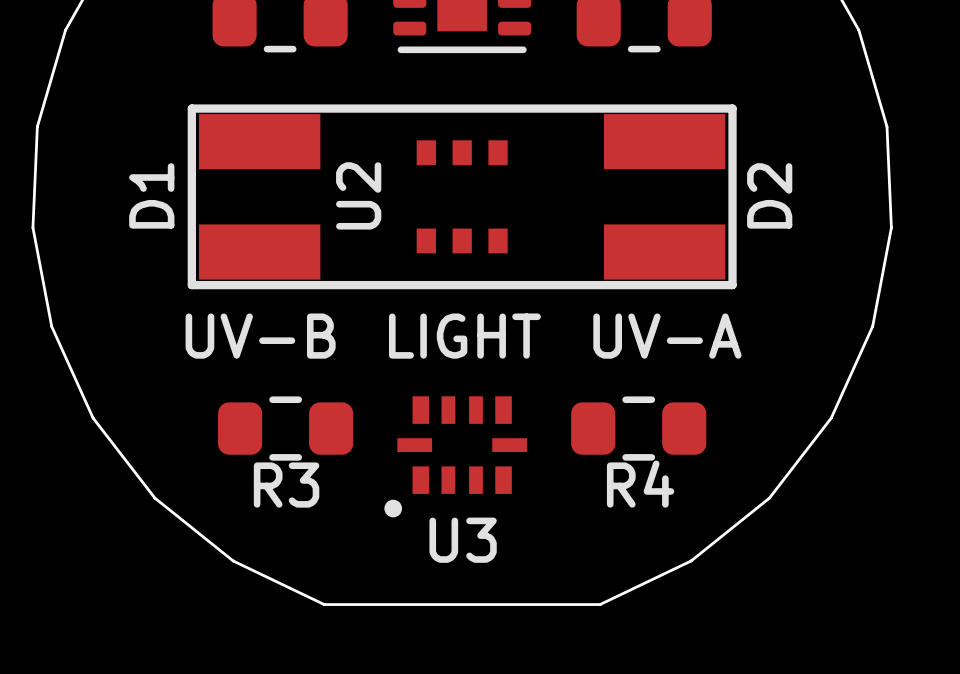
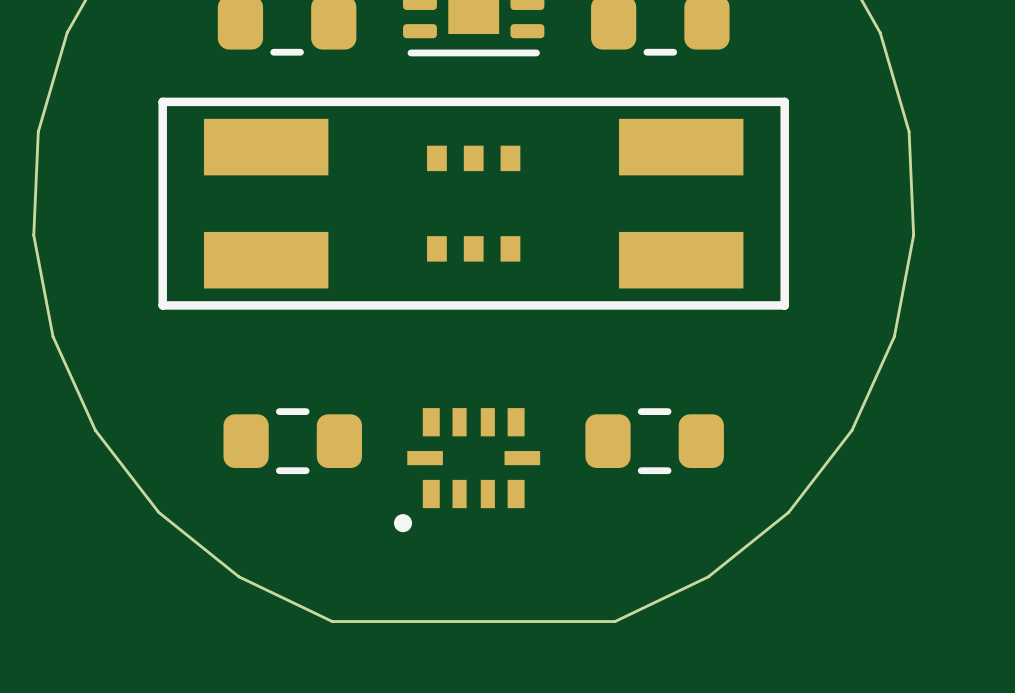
line: (191, 108) (191, 285) (732, 285) (732, 108) (191, 108) -> (162, 101) (162, 305) (784, 305) (784, 101) (162, 101)
D1 name: D1 (151, 195) -> none
U2 name: U2 (358, 195) -> none
D2 name: D2 (769, 195) -> none
text: UV-B (260, 336) -> none
text: LIGHT (464, 336) -> none
text: UV-A (667, 336) -> none
R4 name: R4 (640, 484) -> none
R3 name: R3 (286, 485) -> none
U3 name: U3 (463, 540) -> none

